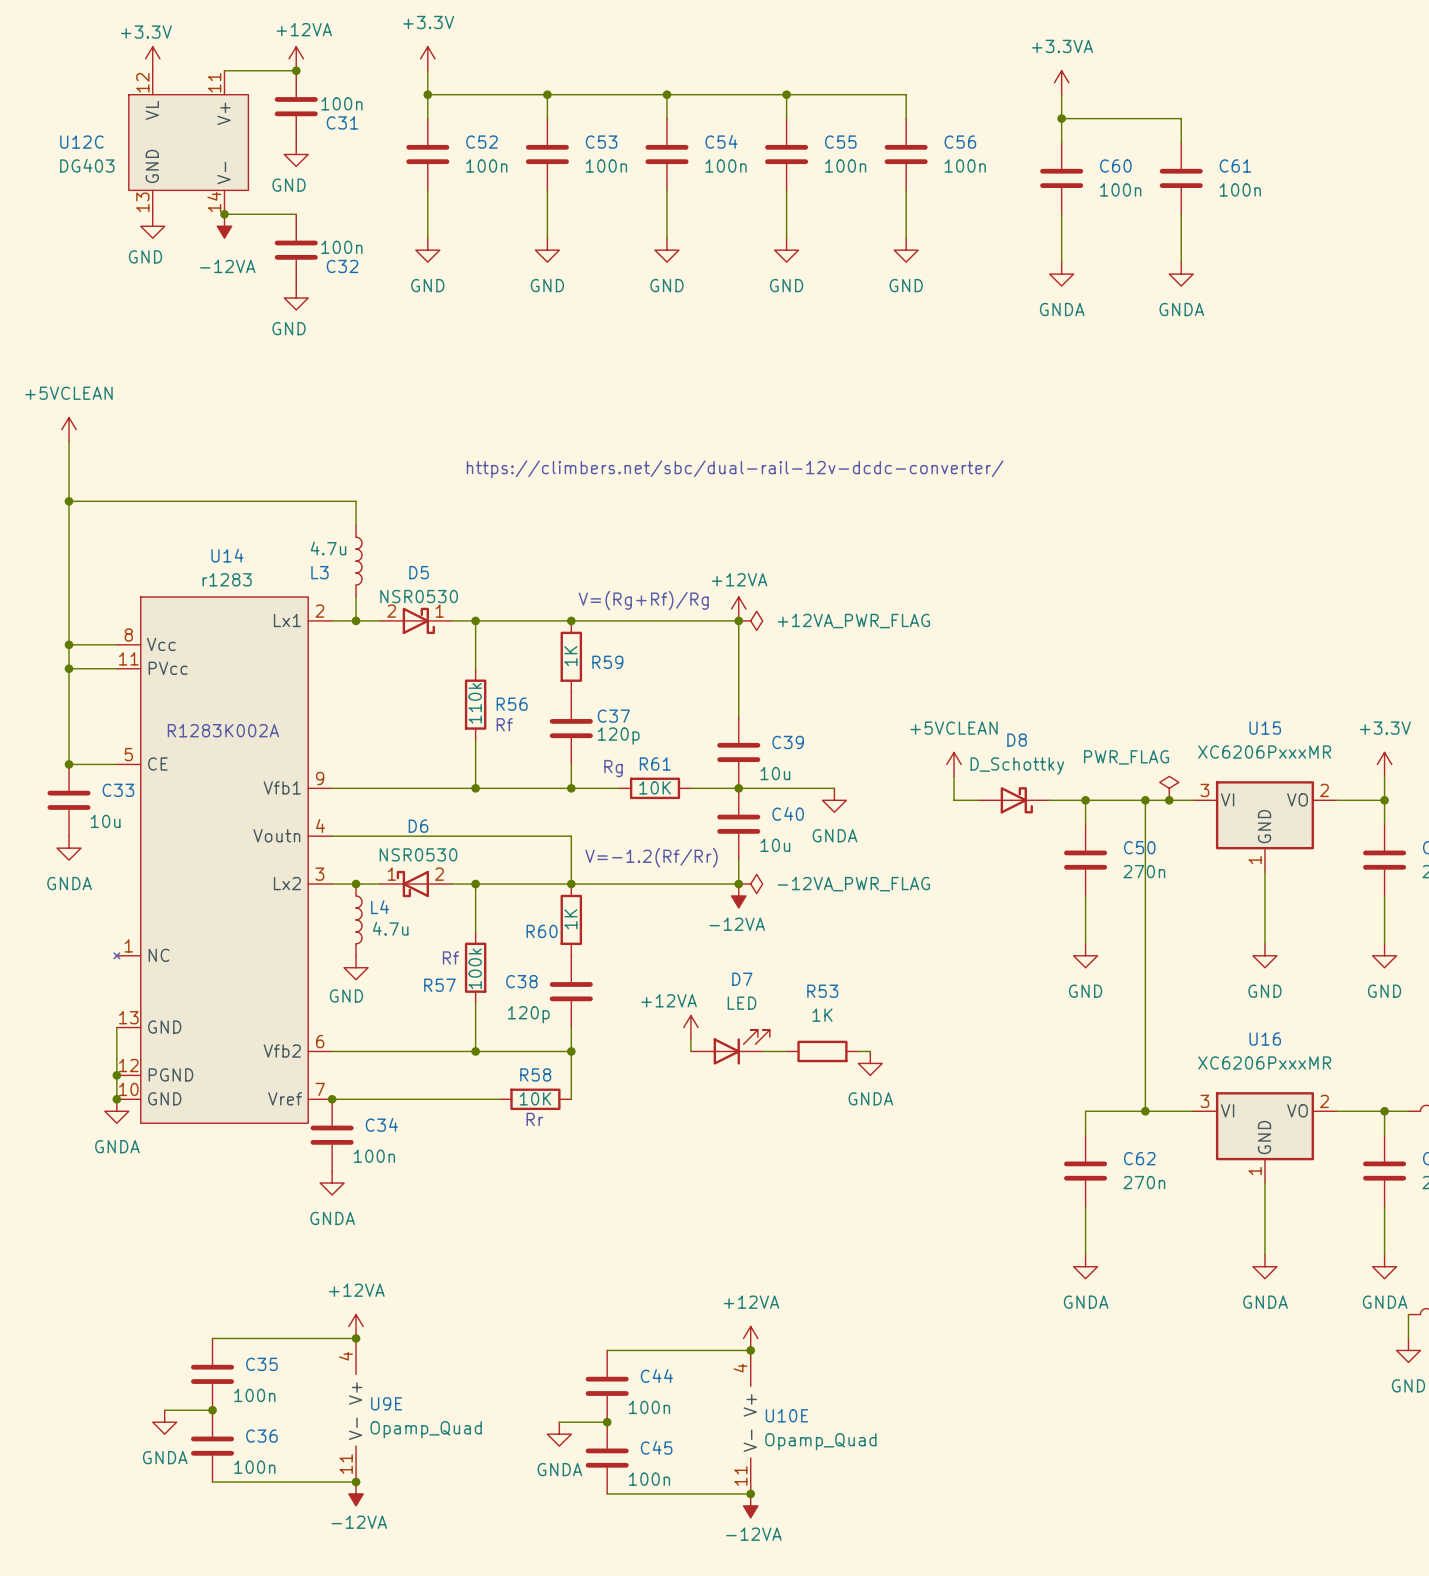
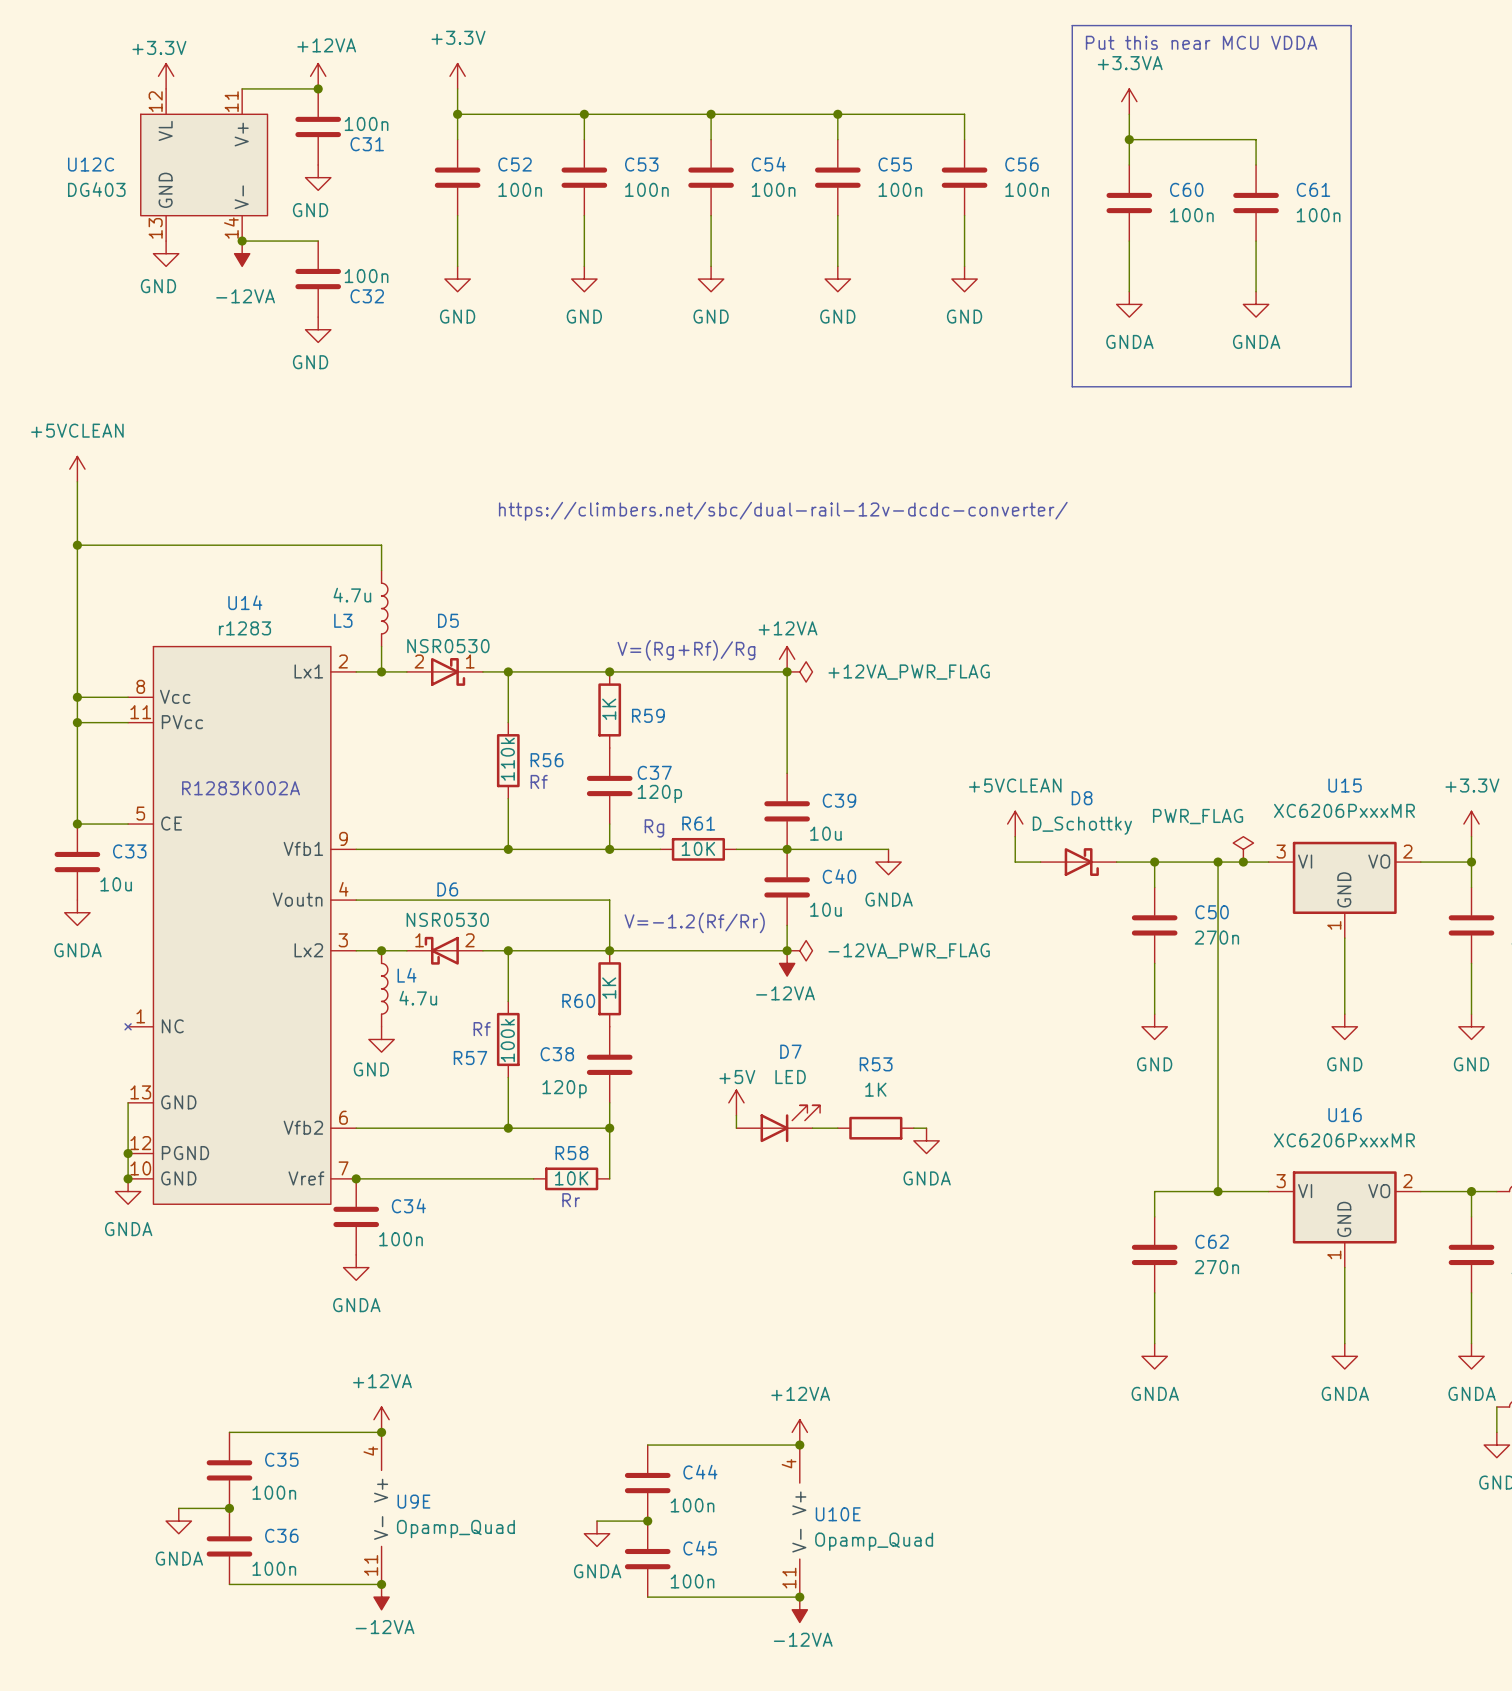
line: none -> (1072, 25) (1351, 25) (1351, 386) (1072, 386) (1072, 25)
text: none -> Put this near MCU VDDA (1201, 42)
power symbol: +12VA (690, 1027) -> +5V (736, 1102)

